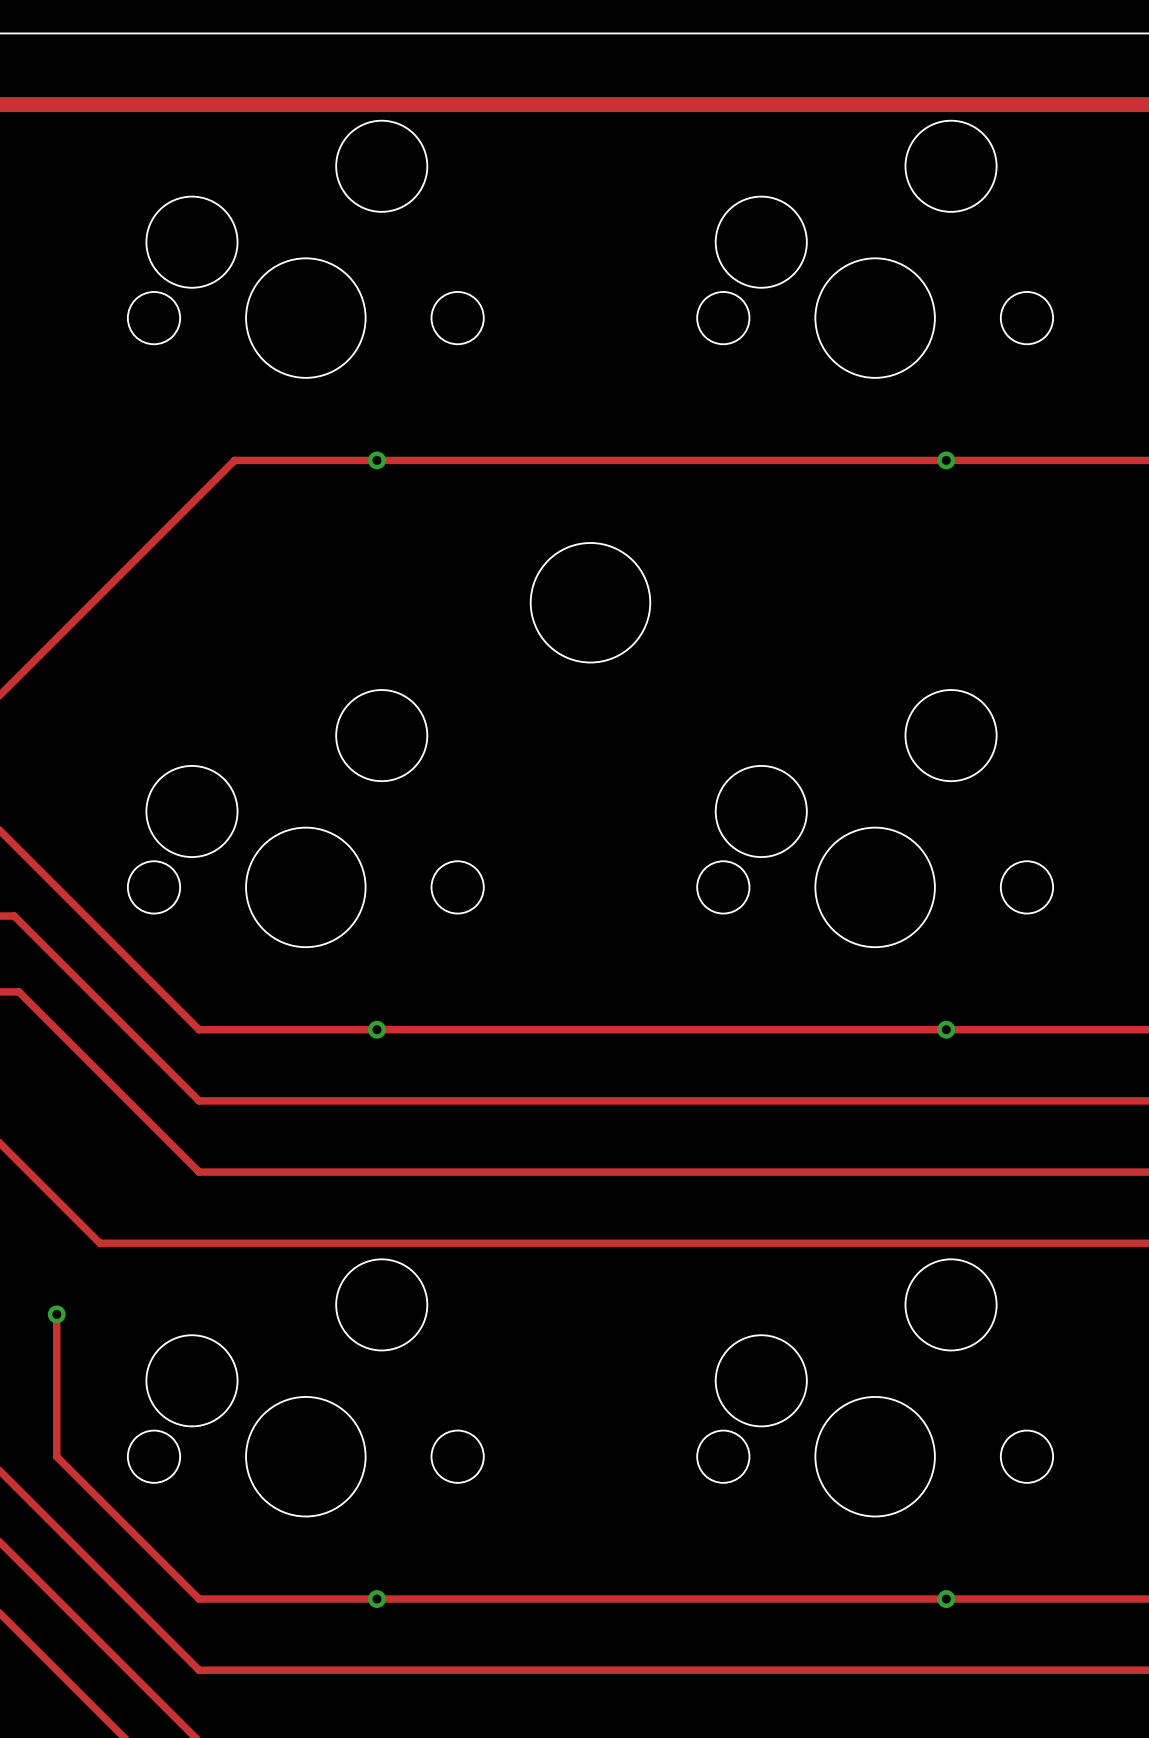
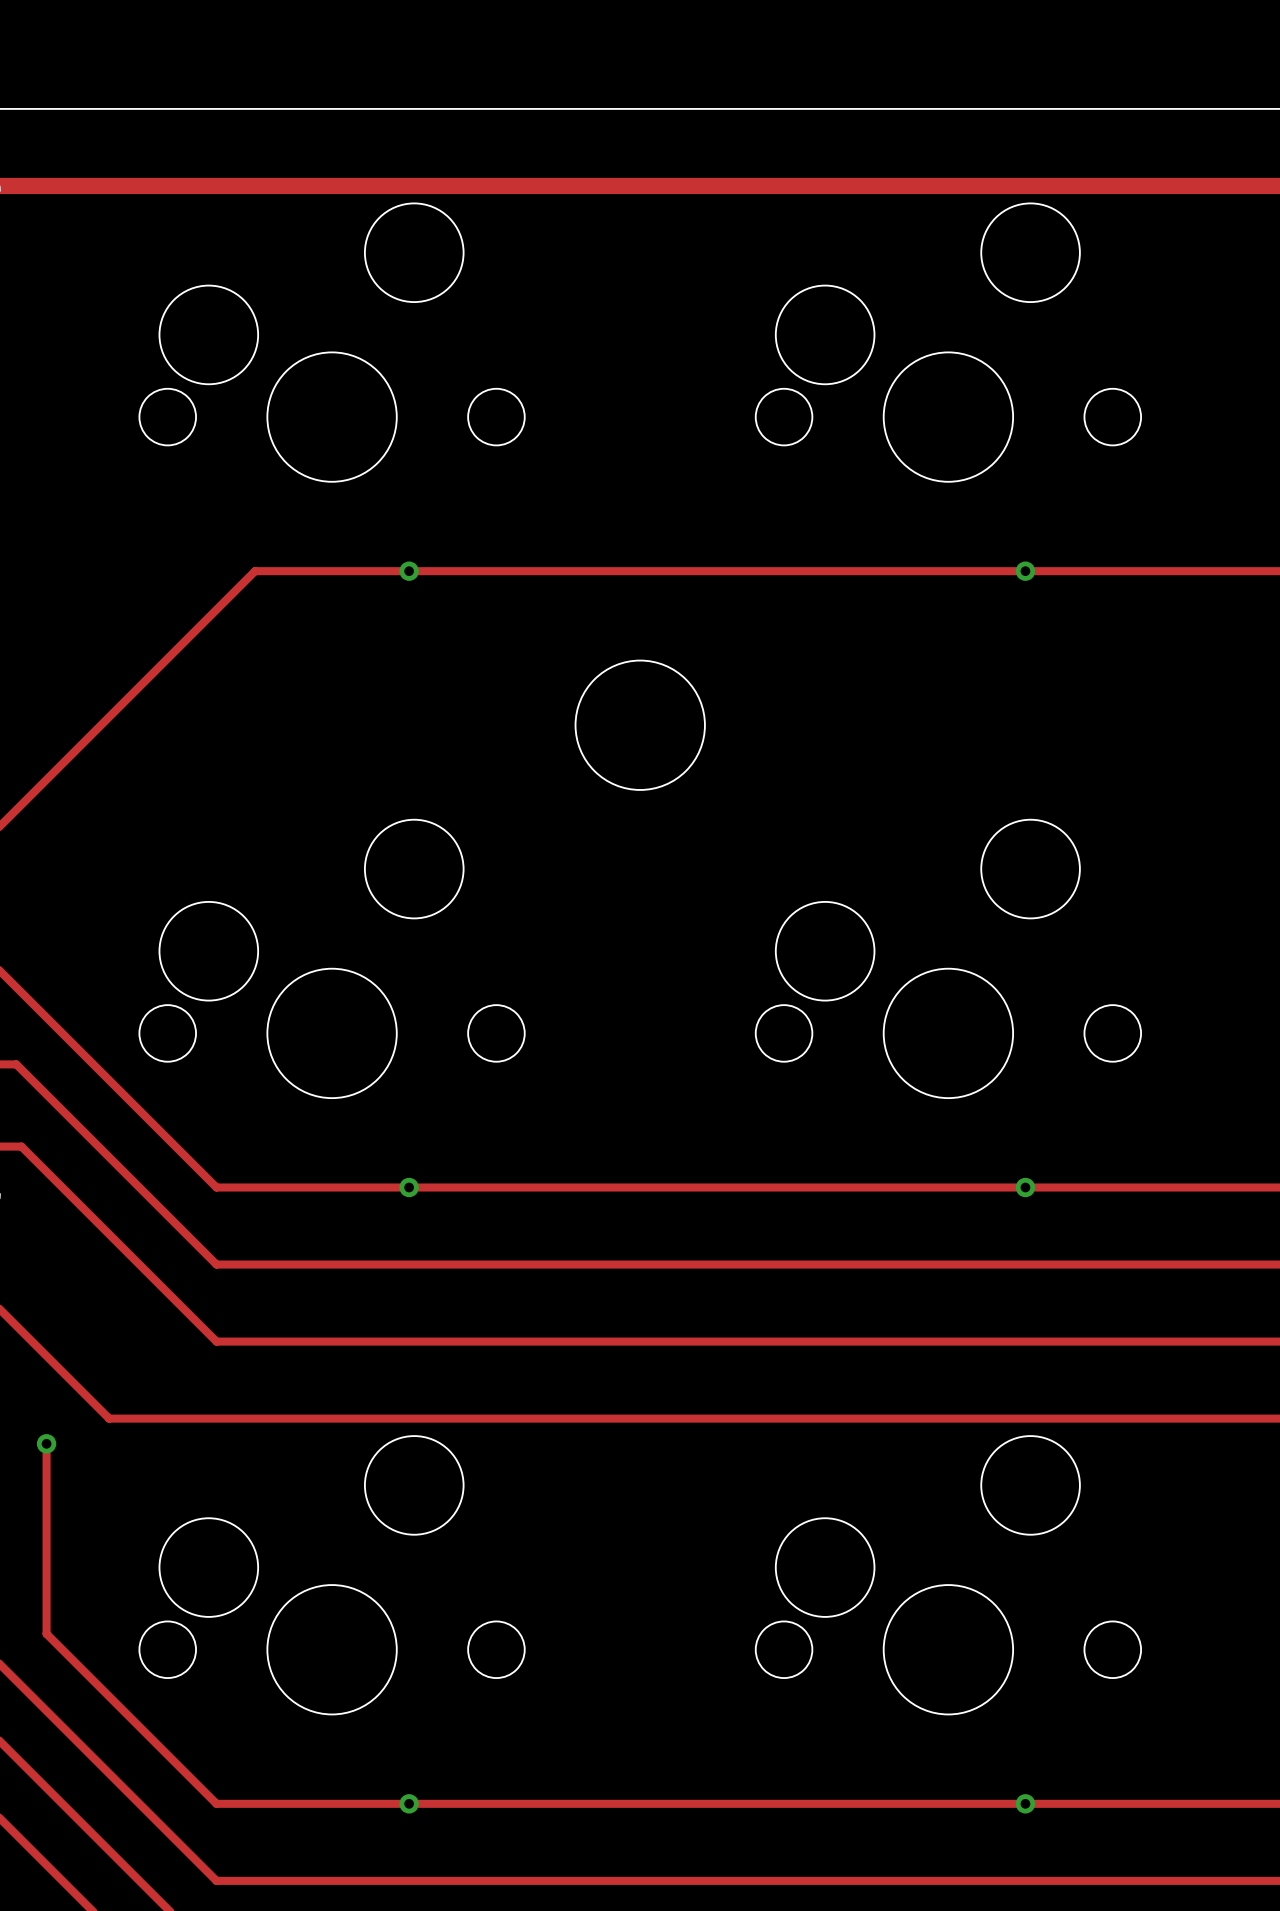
track: (56, 1314) (56, 1456) -> (46, 1443) (46, 1633) (62, 1649)
via position: (56, 1314) -> (46, 1443)

